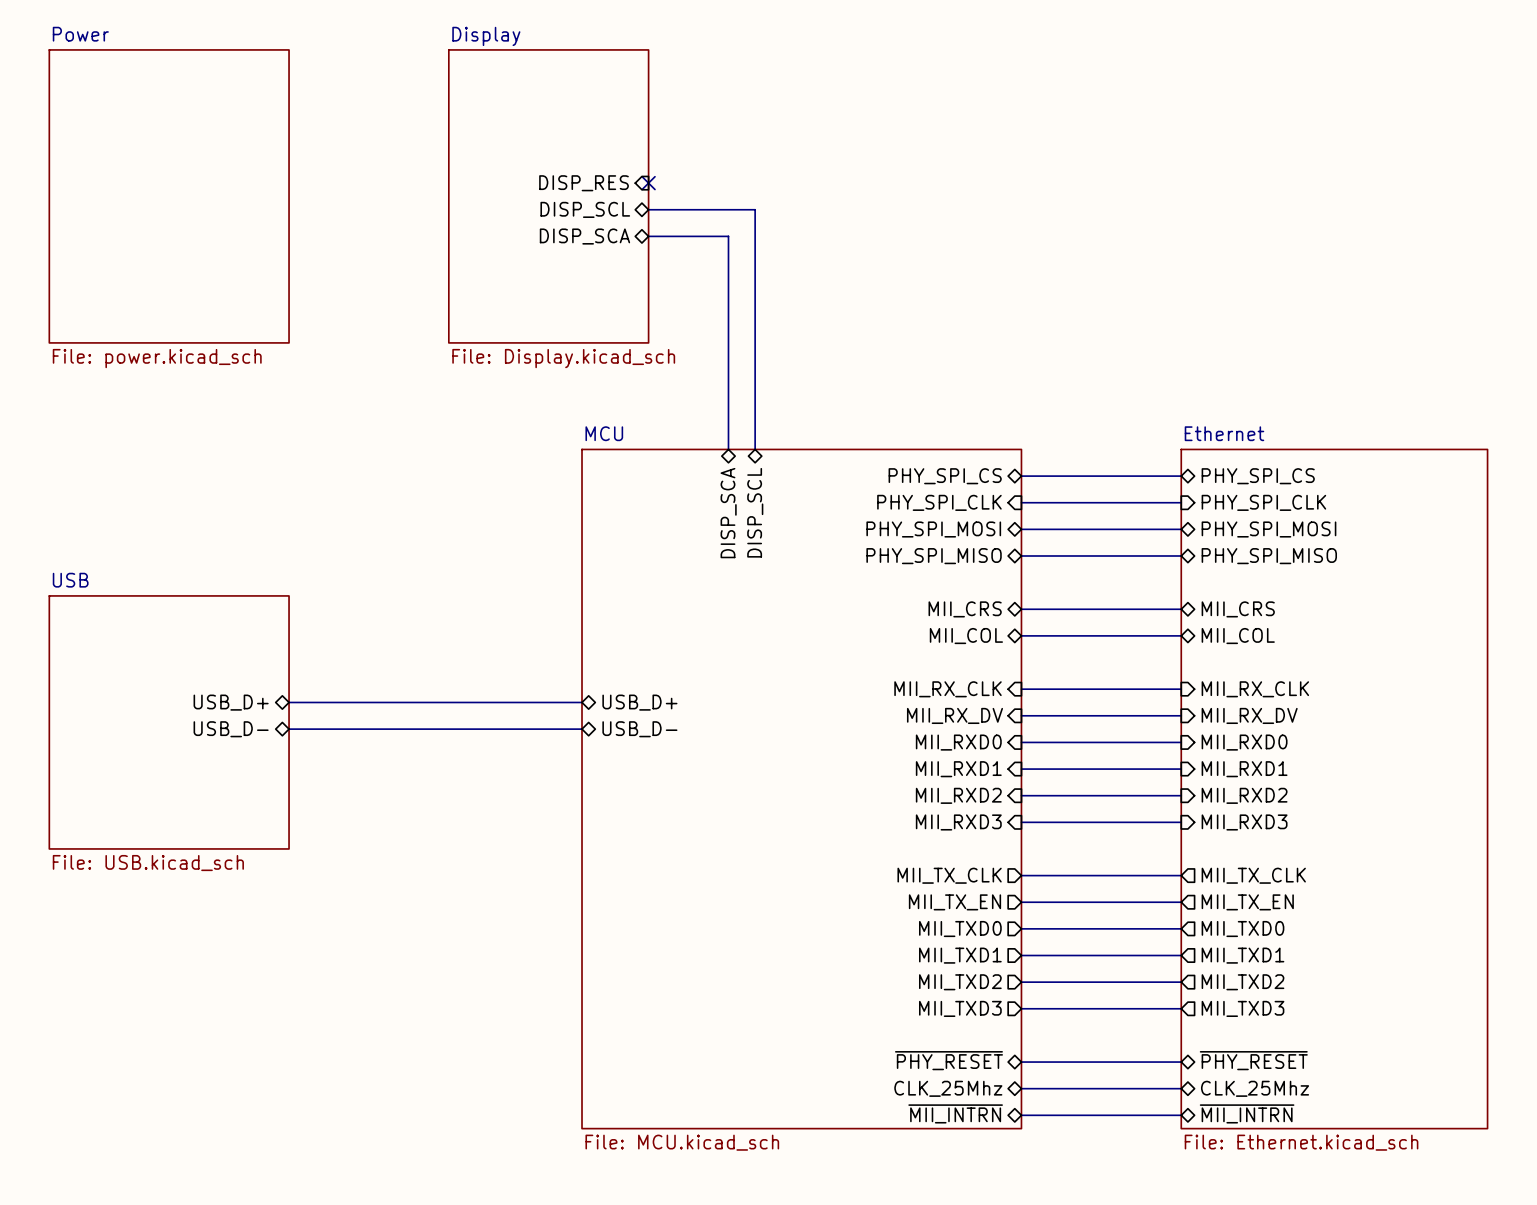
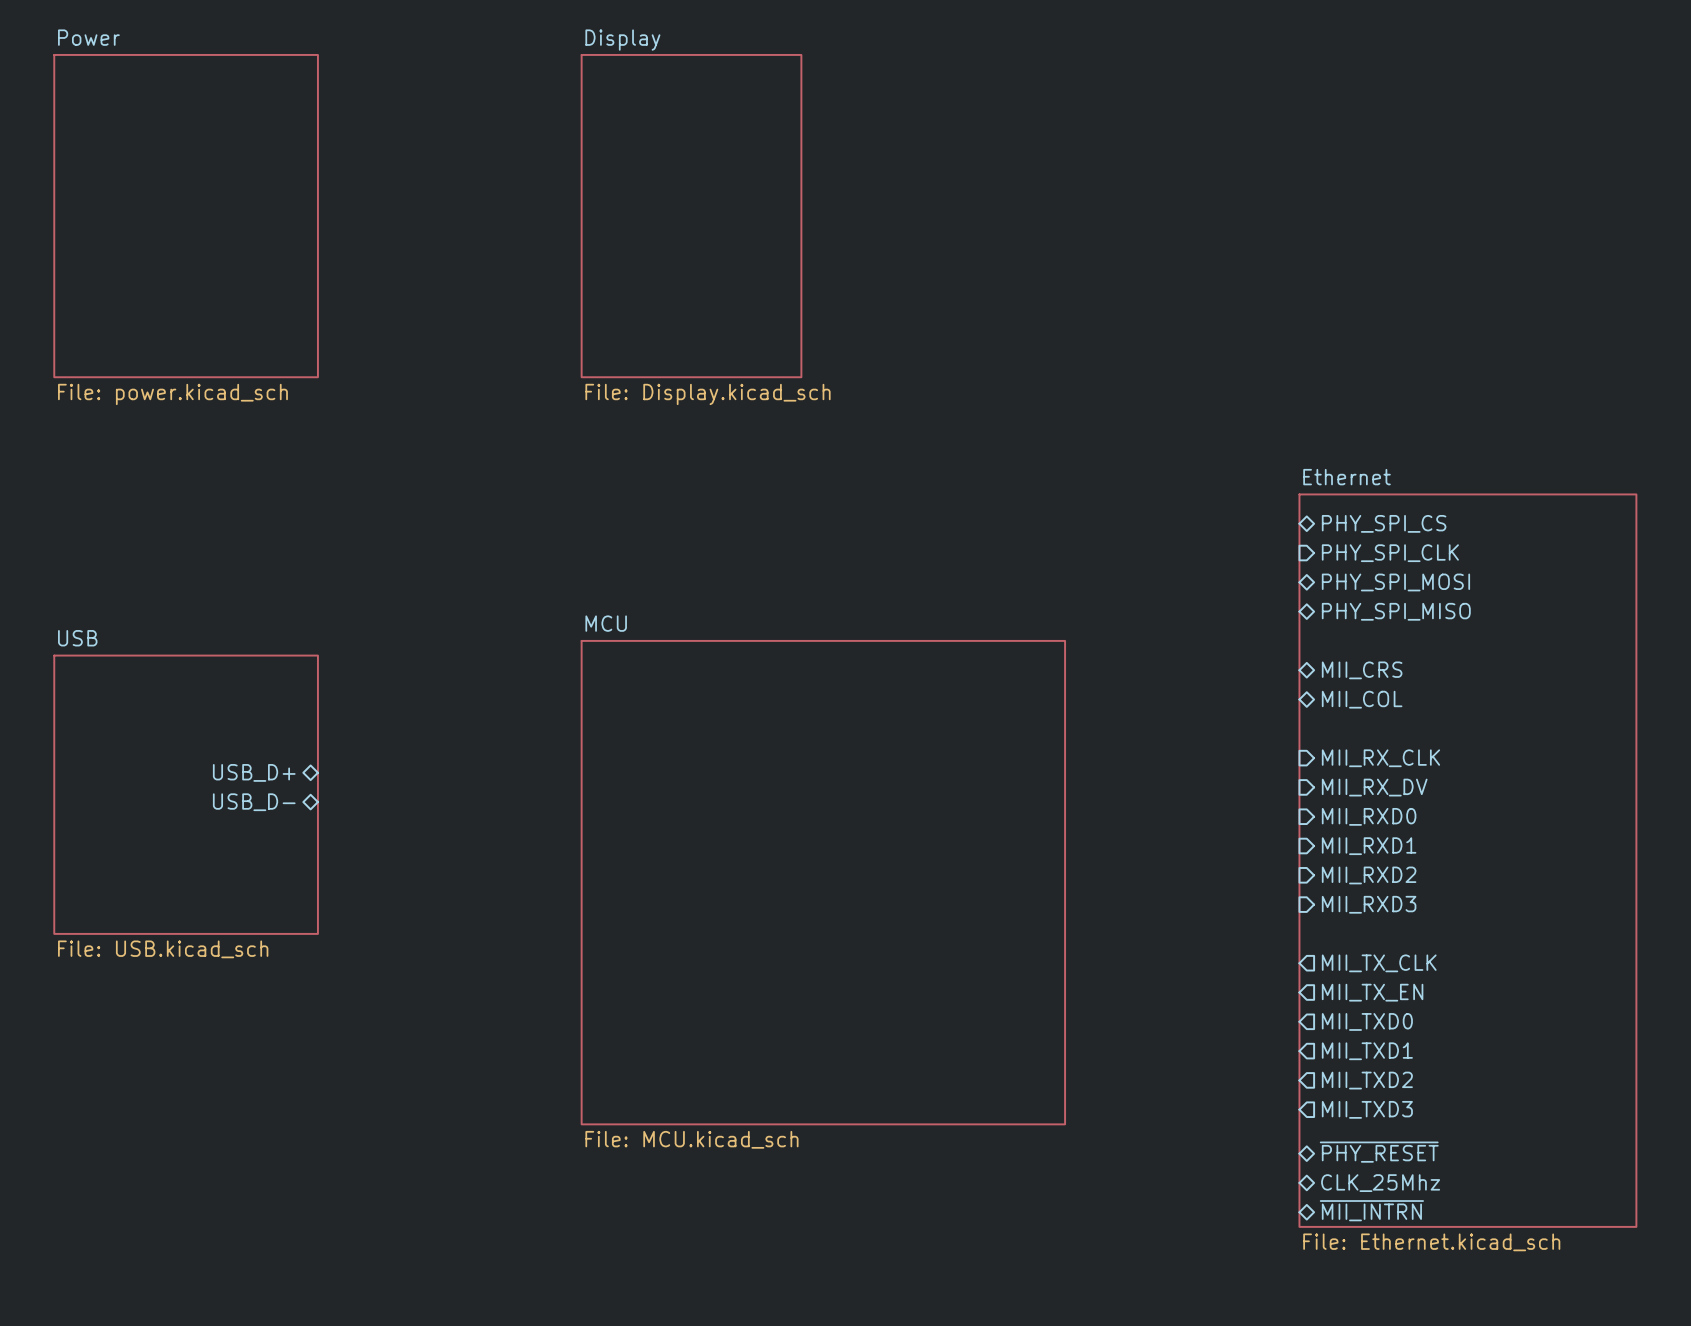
sheet pin: DISP_RES (584, 183) -> none
no-connect mark: (648, 183) -> none
sheet Display position: (548, 196) -> (691, 216)
sheet pin: DISP_SCL (585, 209) -> none
wire: (648, 209) (755, 209) (755, 449) -> none
sheet pin: DISP_SCA (584, 236) -> none
wire: (648, 236) (728, 236) (728, 449) -> none
sheet Ethernet shape: [1180, 448, 1489, 1130] -> [1298, 493, 1638, 1228]
sheet pin: PHY_SPI_CS (945, 476) -> none
wire: (1021, 476) (1181, 476) -> none
sheet pin: PHY_SPI_CLK (939, 502) -> none
wire: (1021, 502) (1181, 502) -> none
sheet pin: DISP_SCL (755, 512) -> none
sheet pin: DISP_SCA (728, 513) -> none
sheet pin: PHY_SPI_MOSI (933, 529) -> none
wire: (1021, 529) (1181, 529) -> none
wire: (1021, 555) (1181, 555) -> none
sheet pin: PHY_SPI_MISO (934, 556) -> none
sheet pin: MII_CRS (965, 609) -> none
wire: (1021, 609) (1181, 609) -> none
wire: (1021, 635) (1181, 635) -> none
sheet pin: MII_COL (966, 636) -> none
sheet pin: MII_RX_CLK (948, 689) -> none
wire: (1021, 689) (1181, 689) -> none
wire: (289, 702) (582, 702) -> none
sheet pin: USB_D+ (639, 702) -> none
sheet pin: MII_RX_DV (954, 715) -> none
wire: (1021, 715) (1181, 715) -> none
wire: (289, 729) (582, 729) -> none
sheet pin: USB_D- (639, 729) -> none
sheet pin: MII_RXD0 (958, 742) -> none
wire: (1021, 742) (1181, 742) -> none
sheet pin: MII_RXD1 (958, 769) -> none
wire: (1021, 769) (1181, 769) -> none
sheet MCU: File: MCU.kicad_sch (801, 789) -> none
sheet pin: MII_RXD2 (958, 795) -> none
wire: (1021, 795) (1181, 795) -> none
sheet MCU: none -> File: MCU.kicad_sch (823, 882)
sheet pin: MII_RXD3 (958, 822) -> none
wire: (1021, 822) (1181, 822) -> none
sheet pin: MII_TX_CLK (949, 875) -> none
wire: (1021, 875) (1181, 875) -> none
sheet pin: MII_TX_EN (954, 902) -> none
wire: (1021, 902) (1181, 902) -> none
wire: (1021, 928) (1181, 928) -> none
sheet pin: MII_TXD0 (960, 929) -> none
sheet pin: MII_TXD1 (960, 955) -> none
wire: (1021, 955) (1181, 955) -> none
sheet pin: MII_TXD2 (960, 982) -> none
wire: (1021, 982) (1181, 982) -> none
sheet pin: MII_TXD3 (960, 1008) -> none
wire: (1021, 1008) (1181, 1008) -> none
sheet pin: ~{PHY_RESET} (948, 1060) -> none
sheet pin position: ~{PHY_RESET} (1253, 1060) -> ~{PHY_RESET} (1379, 1152)
wire: (1021, 1062) (1181, 1062) -> none
sheet pin: CLK_25Mhz (948, 1088) -> none
wire: (1021, 1088) (1181, 1088) -> none
sheet pin position: CLK_25Mhz (1255, 1088) -> CLK_25Mhz (1380, 1183)
sheet pin: ~{MII_INTRN} (955, 1113) -> none
sheet pin position: ~{MII_INTRN} (1247, 1113) -> ~{MII_INTRN} (1371, 1210)
wire: (1021, 1115) (1181, 1115) -> none

